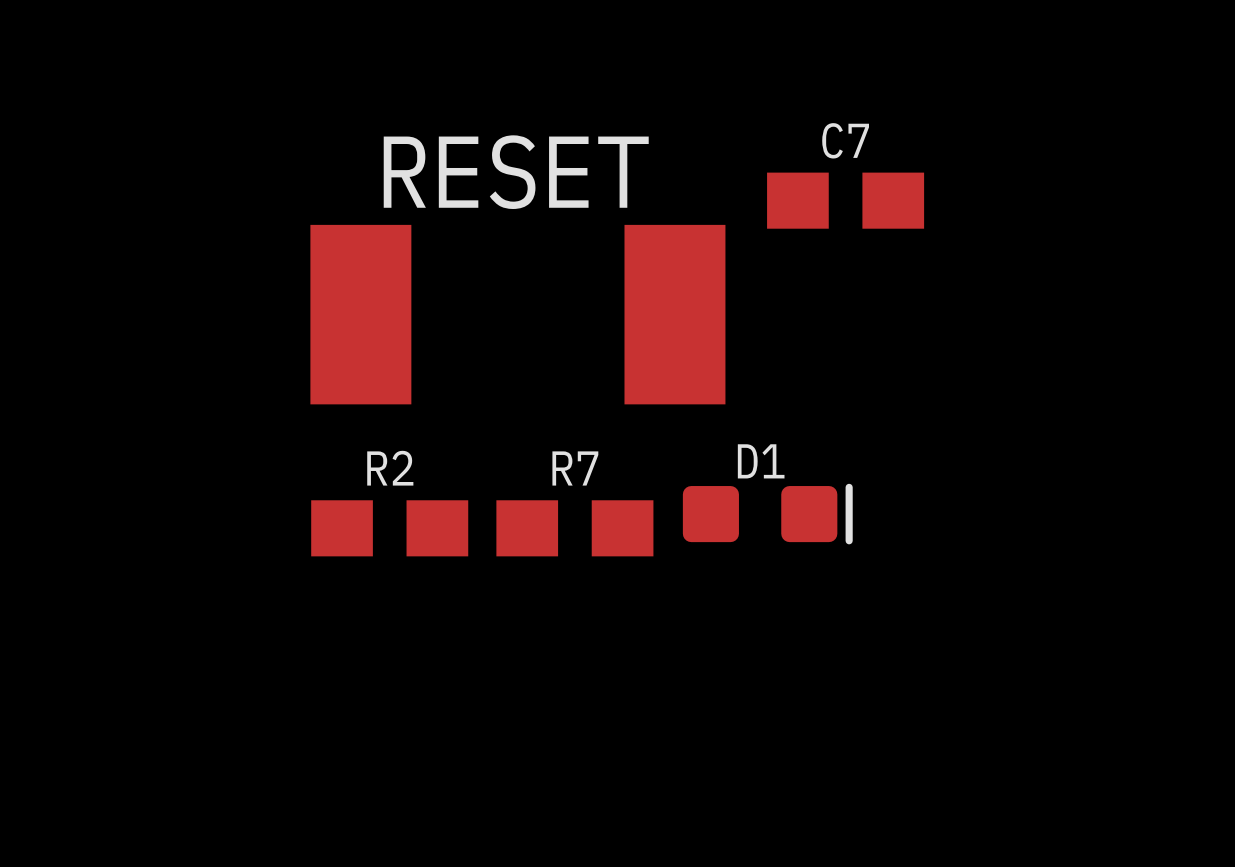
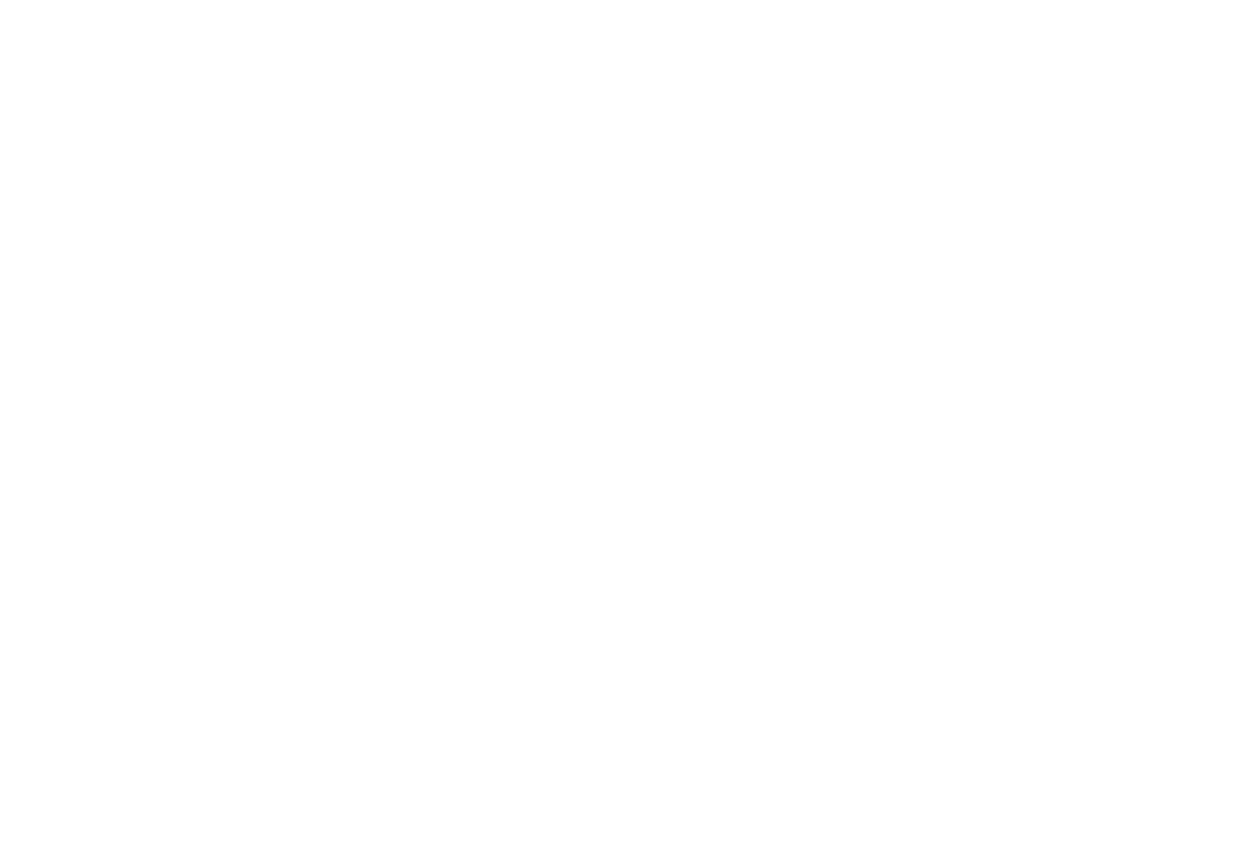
C7: (845, 200) -> none
RESET: (517, 314) -> none
D1: (767, 514) -> none
R2: (389, 528) -> none
R7: (574, 528) -> none

